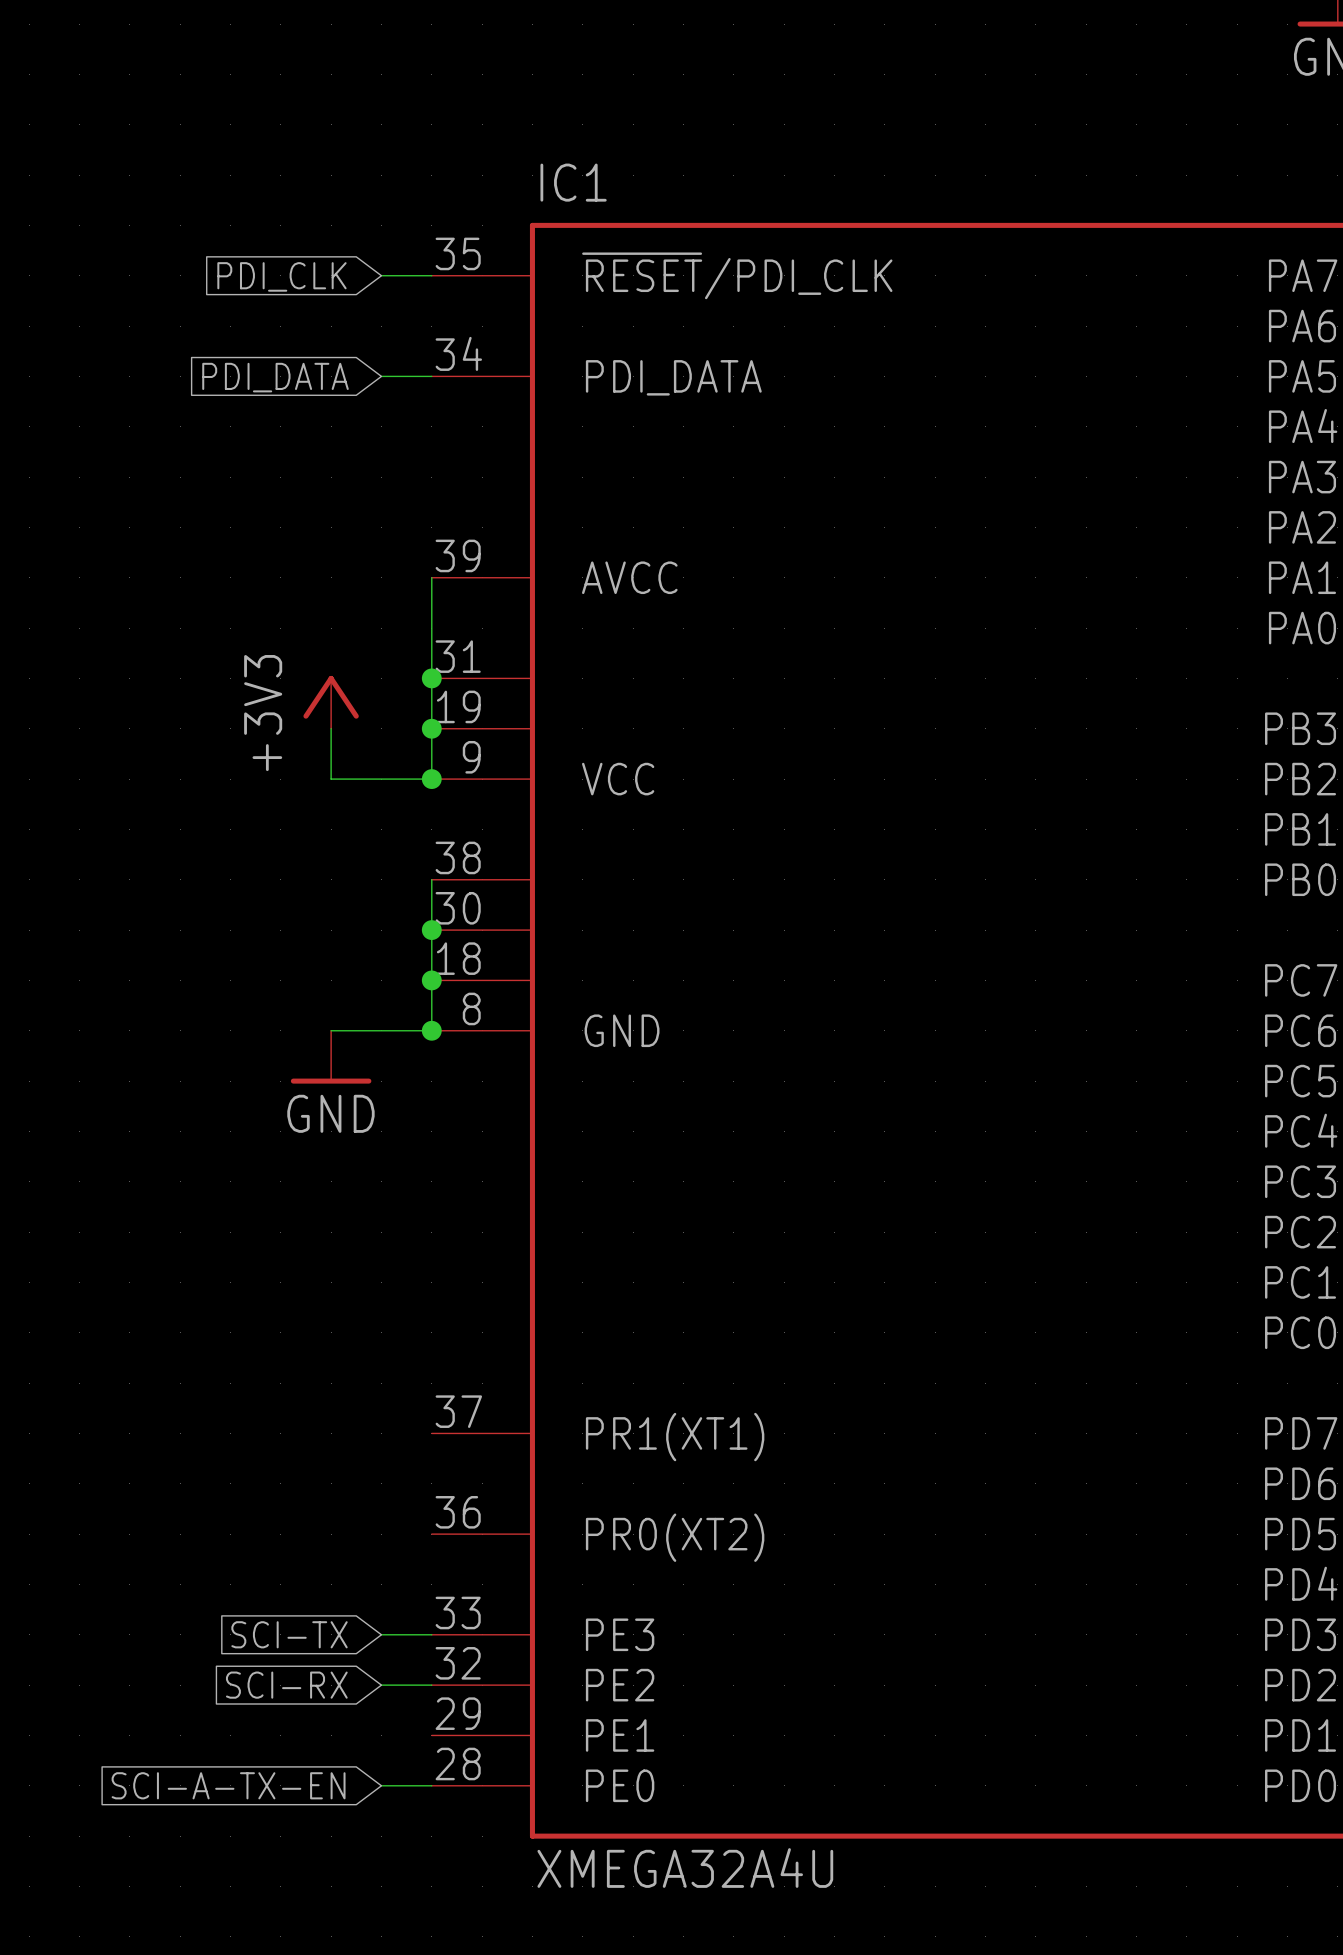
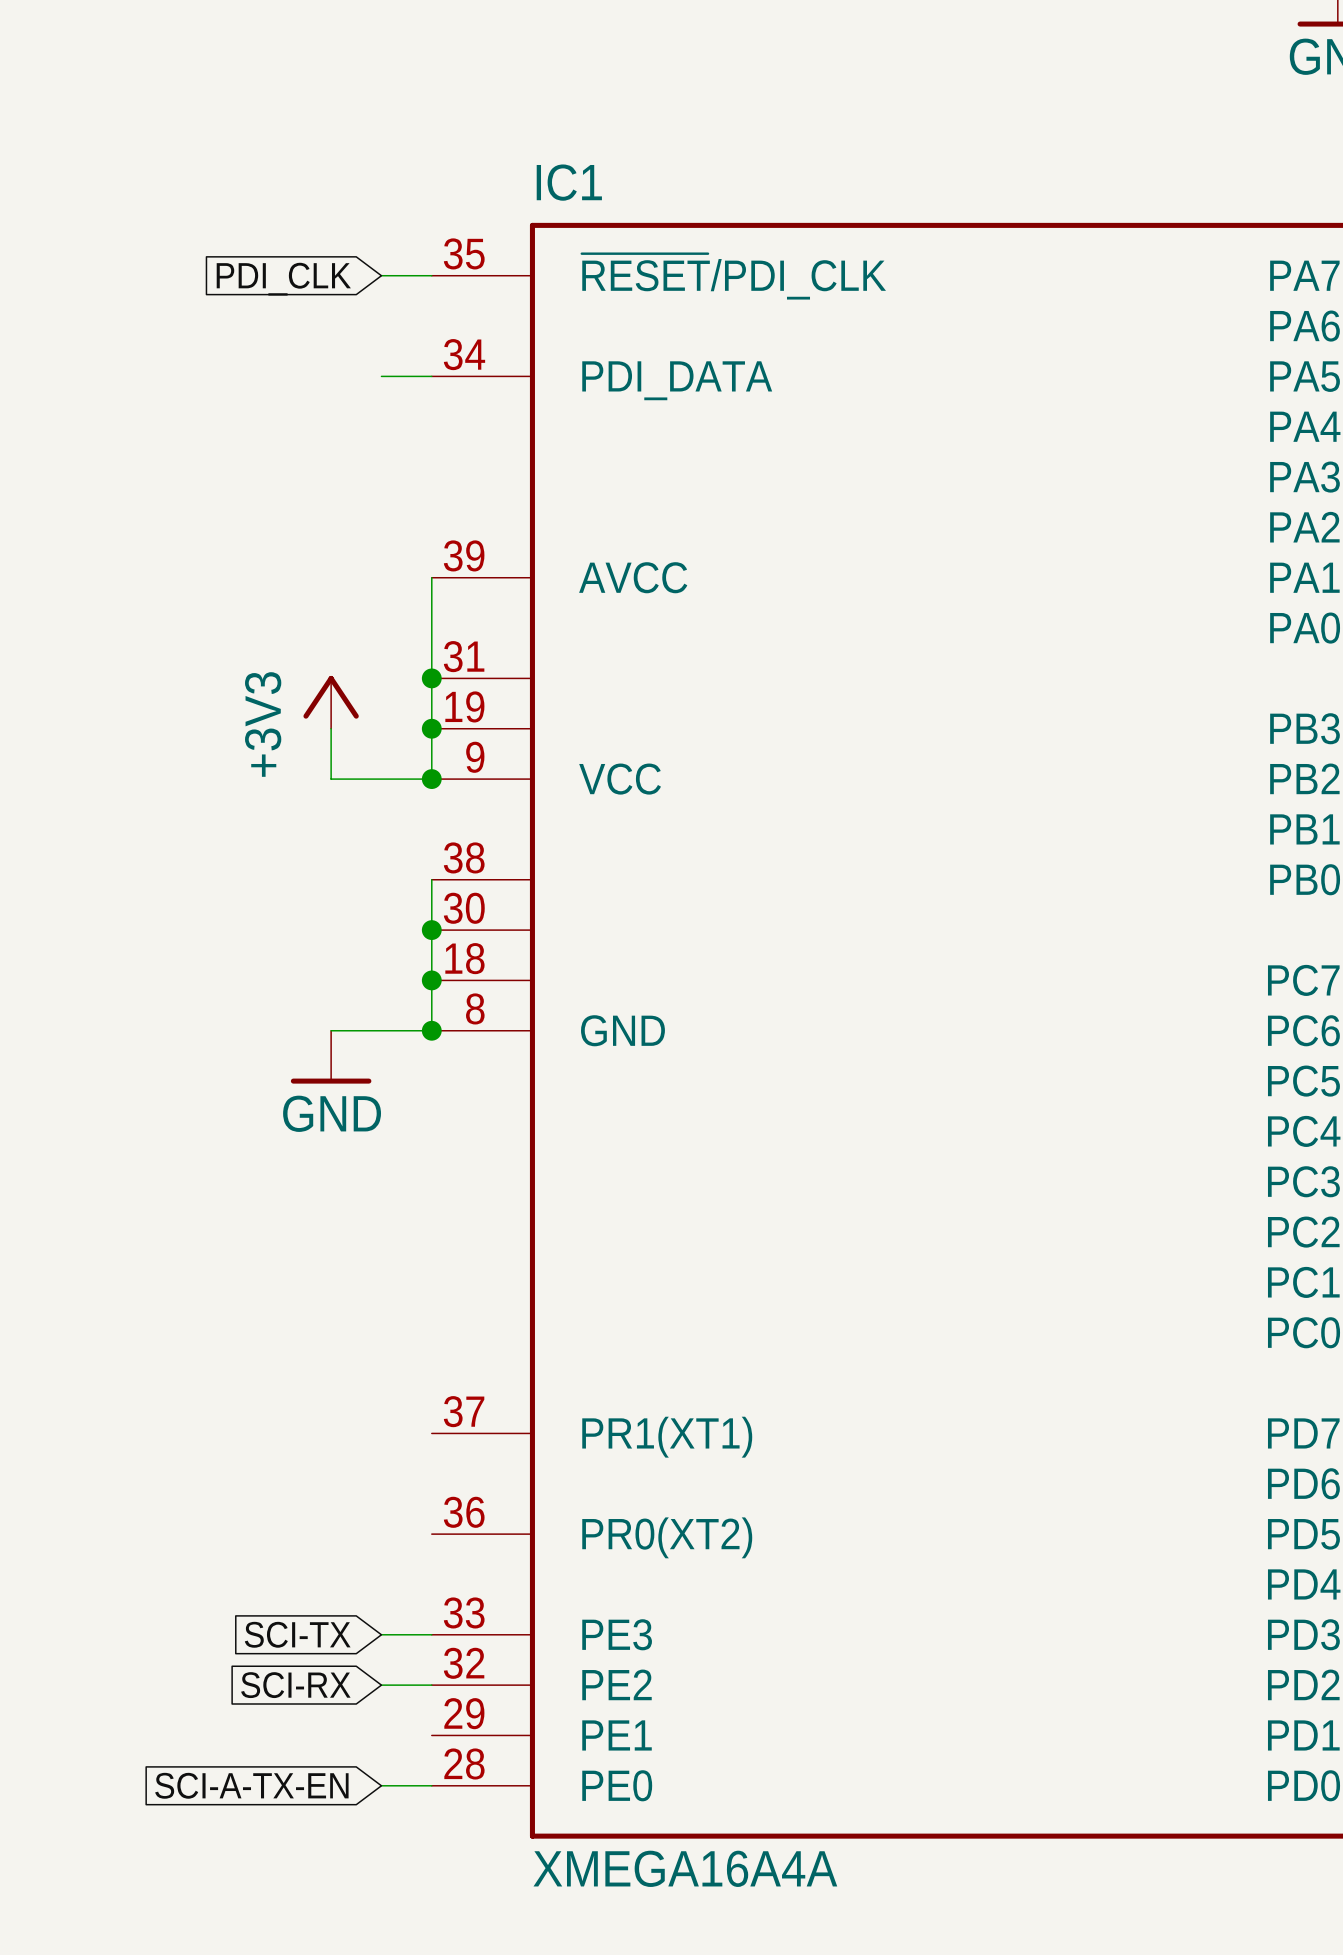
global label: PDI_DATA (275, 377) -> none
IC1 value: XMEGA32A4U (685, 1868) -> XMEGA16A4A (685, 1868)

